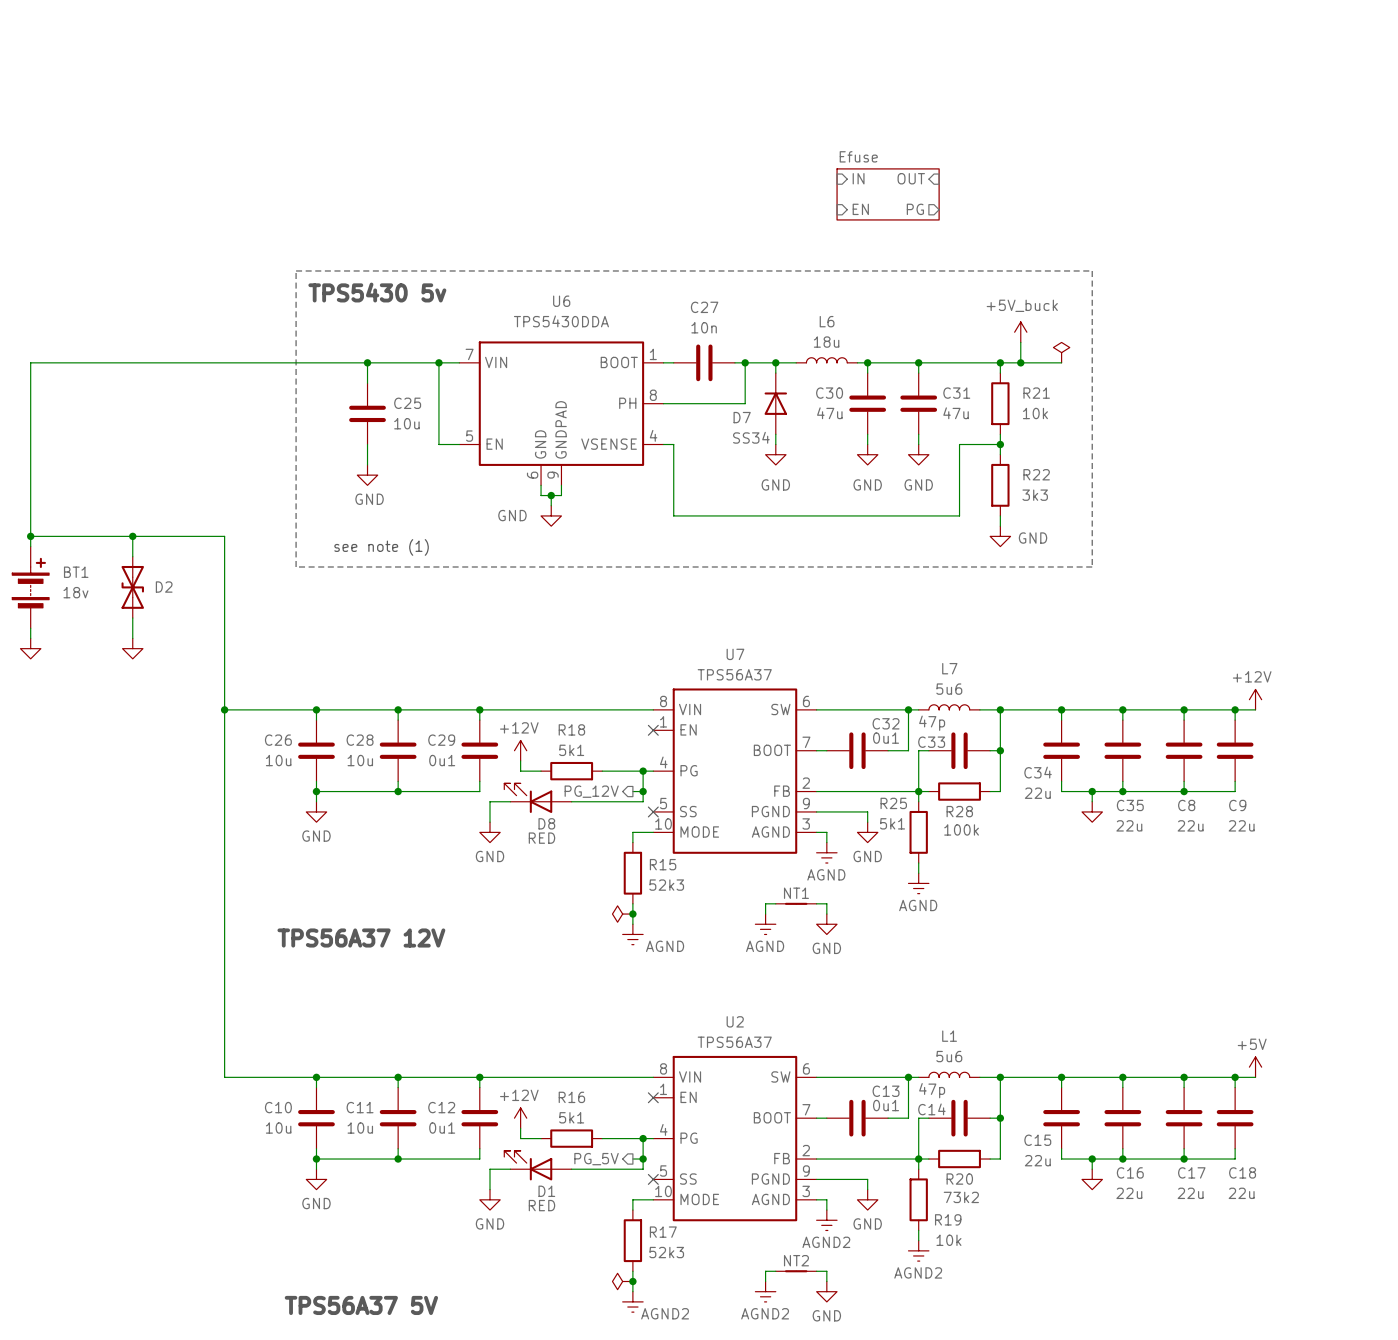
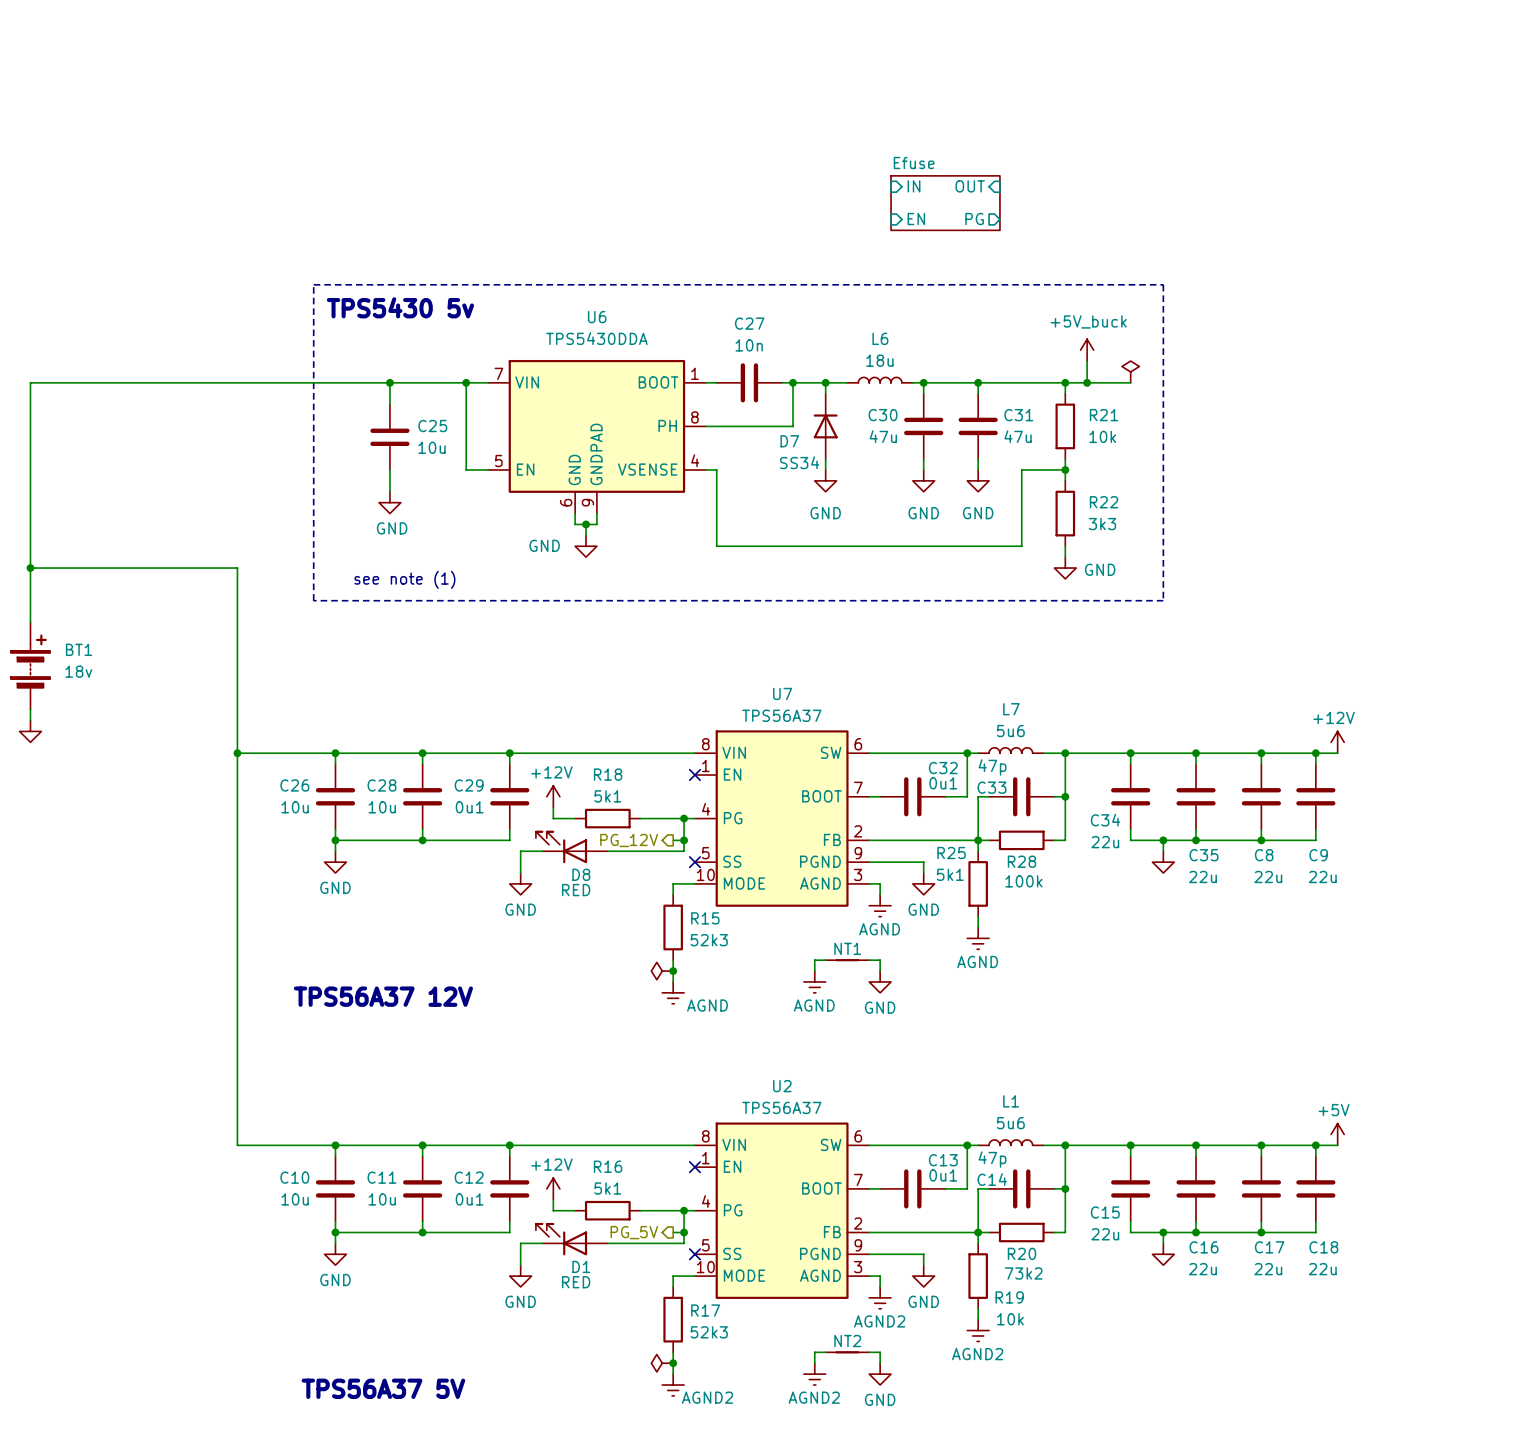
wire: (132, 536) (132, 556) -> none
junction: (132, 536) -> none
BT1 position: (30, 587) -> (30, 666)
D2: (132, 587) -> none
wire: (132, 618) (132, 638) -> none
wire: (30, 628) (30, 638) -> (30, 709) (30, 720)
power symbol position: (30, 648) -> (30, 731)
power symbol: (132, 648) -> none

